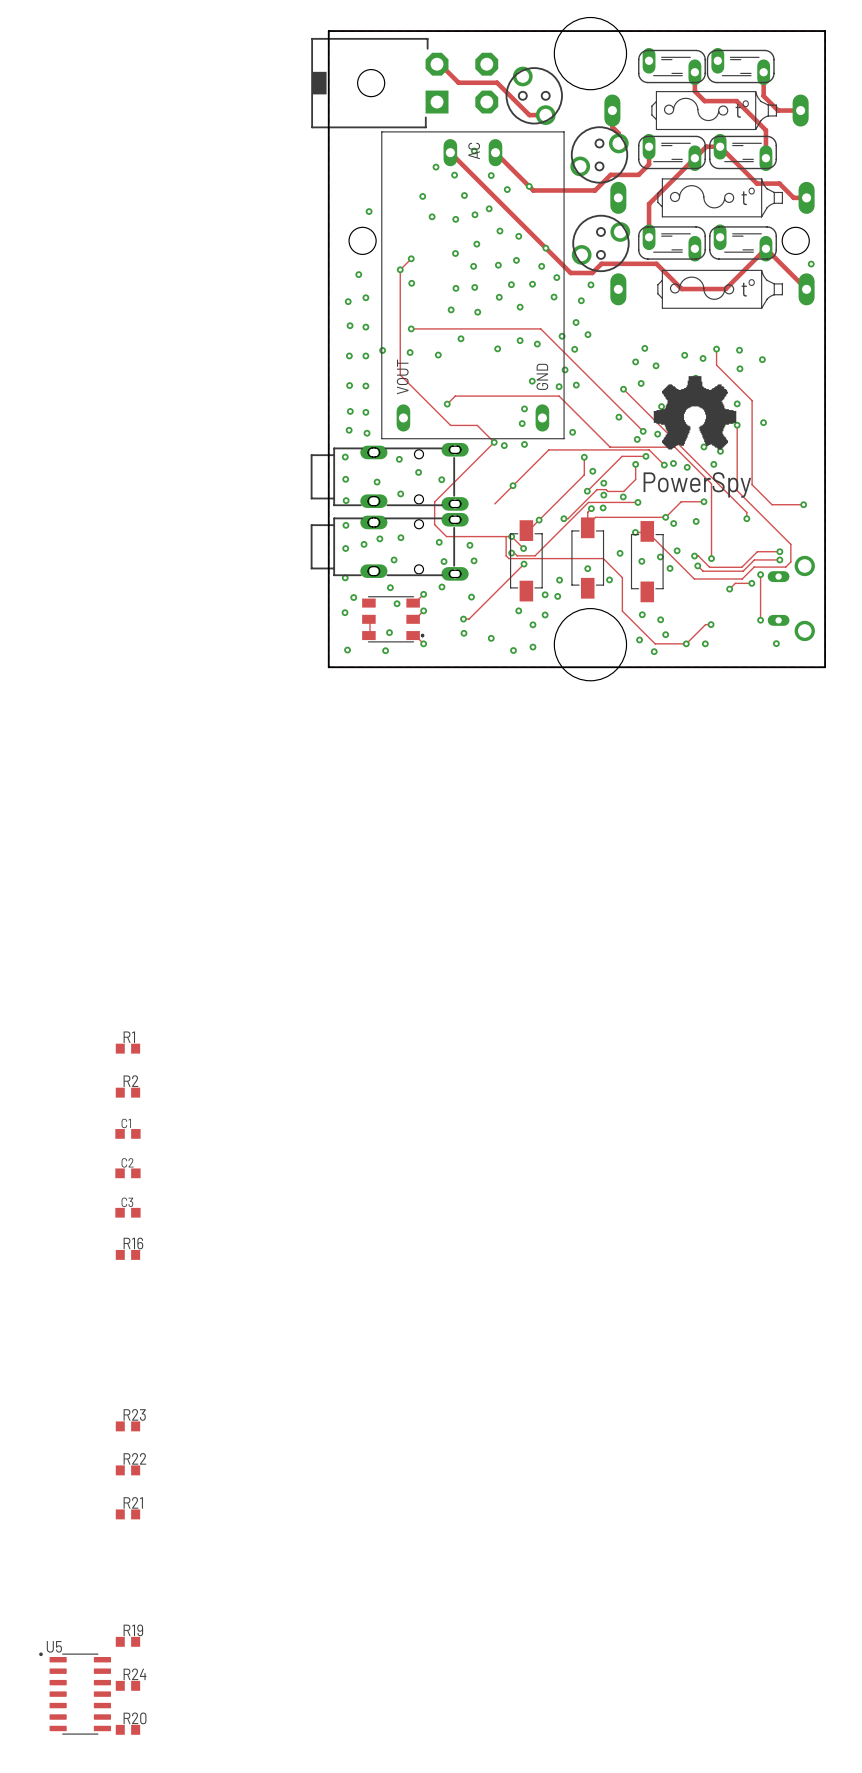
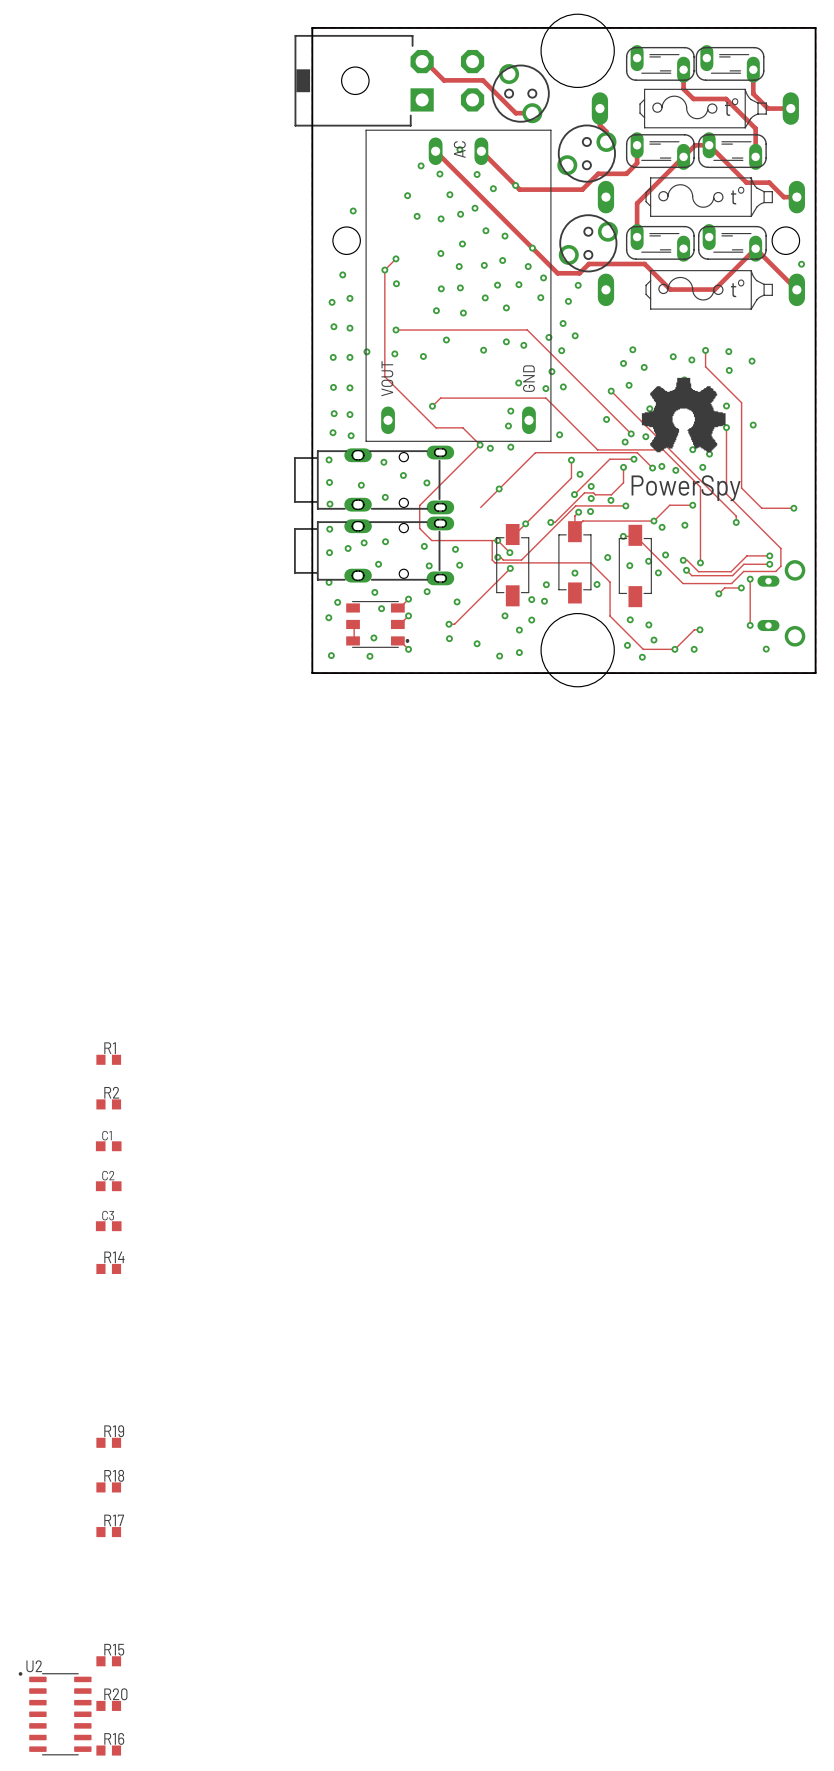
R16 name: R16 (133, 1243) -> R14 (114, 1257)
R23 name: R23 (134, 1414) -> R19 (114, 1431)
R22 name: R22 (134, 1458) -> R18 (114, 1475)
R21 name: R21 (133, 1502) -> R17 (114, 1520)
R19 name: R19 (133, 1630) -> R15 (114, 1649)
U5 name: U5 (54, 1646) -> U2 (34, 1666)
R24 name: R24 (134, 1674) -> R20 (115, 1694)
R20 name: R20 (135, 1718) -> R16 (114, 1738)

